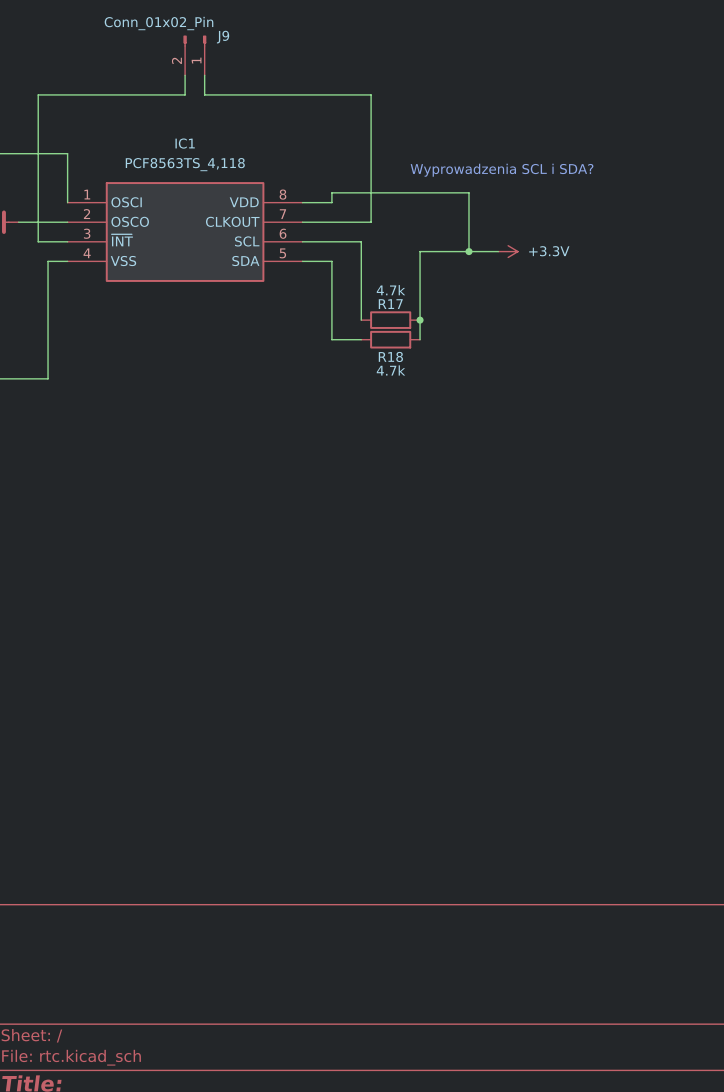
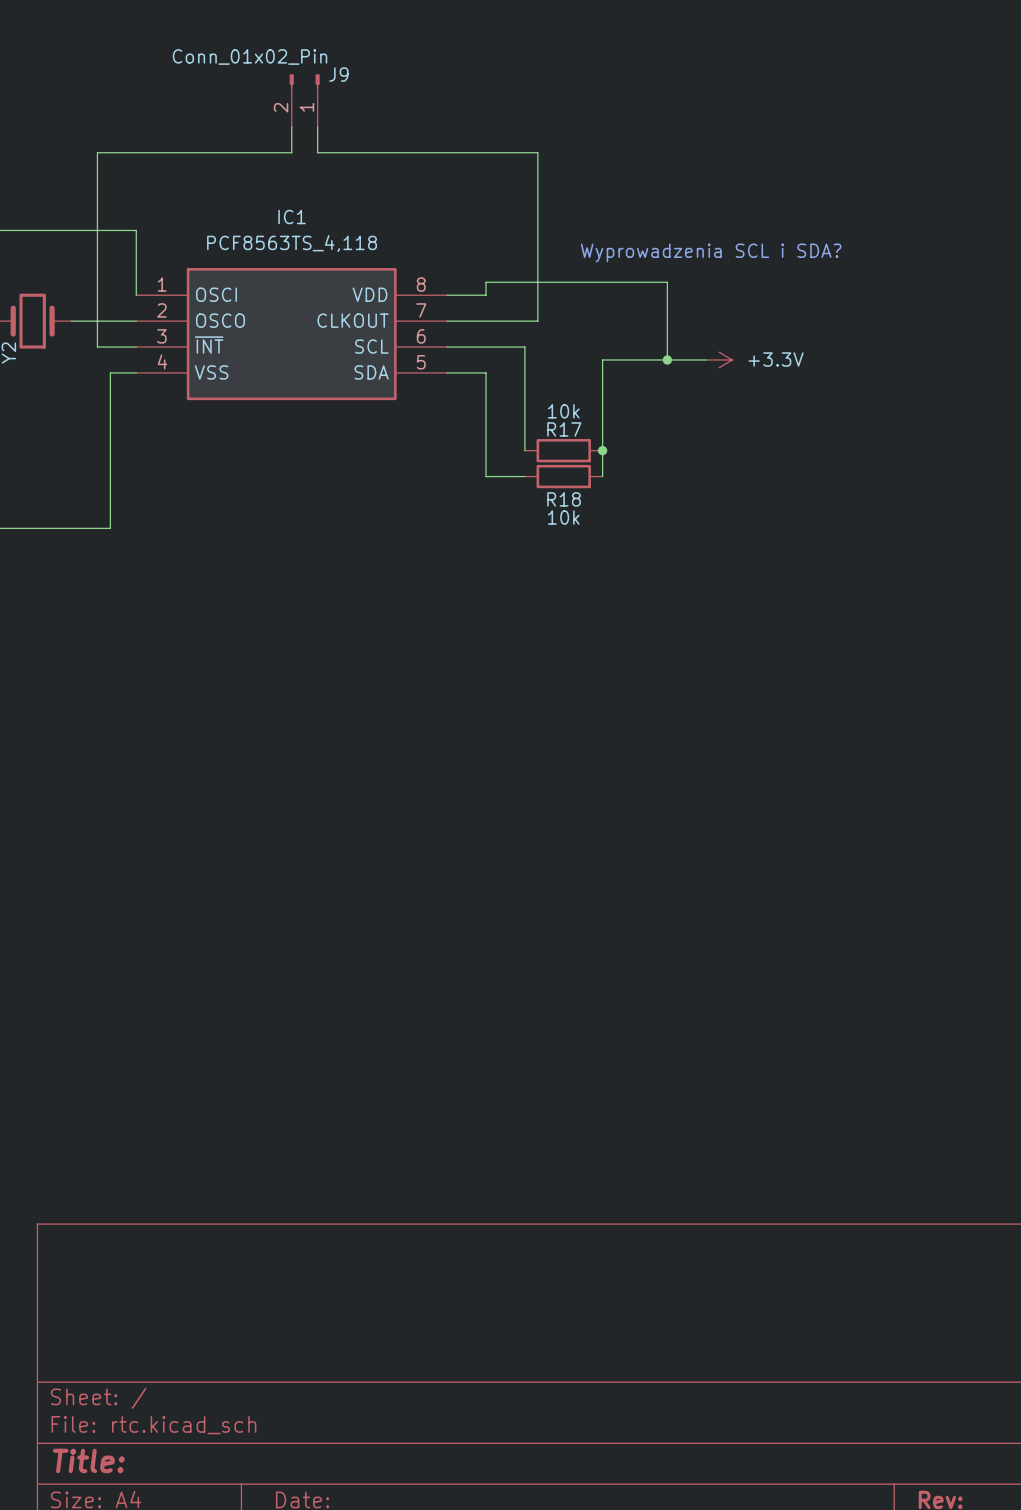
R17 value: 4.7k (390, 290) -> 10k (563, 411)
R18 value: 4.7k (390, 370) -> 10k (563, 517)

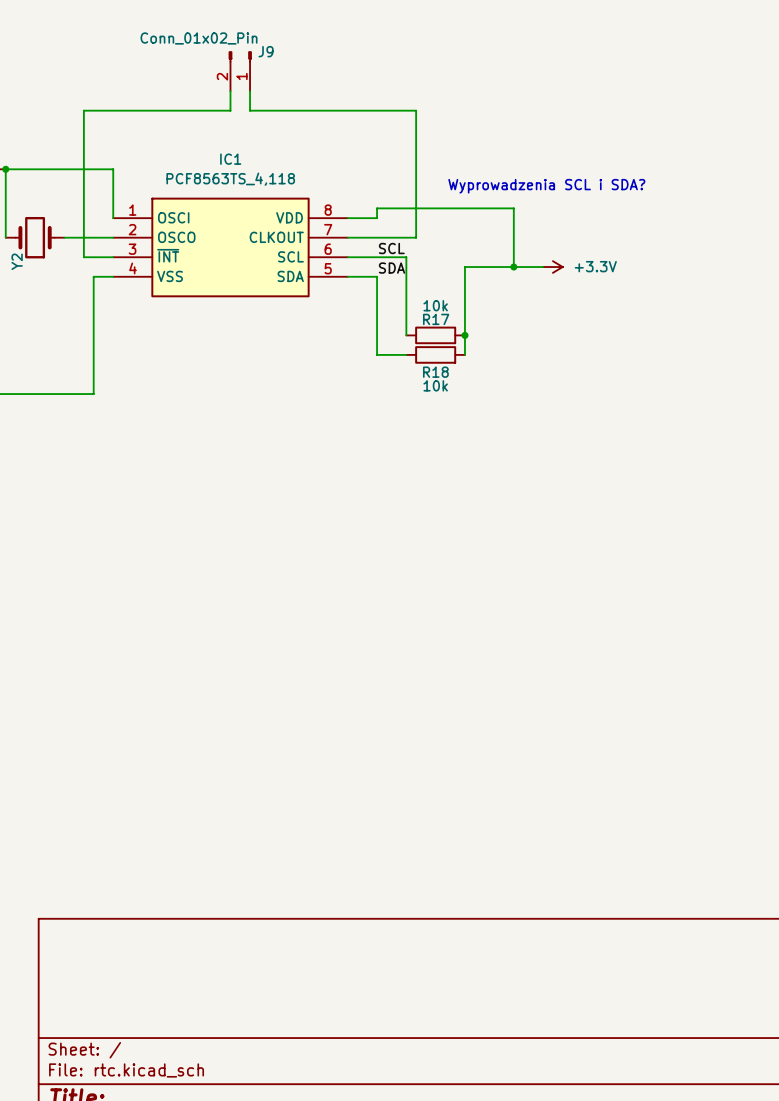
label: none -> SCL (391, 248)
label: none -> SDA (392, 268)

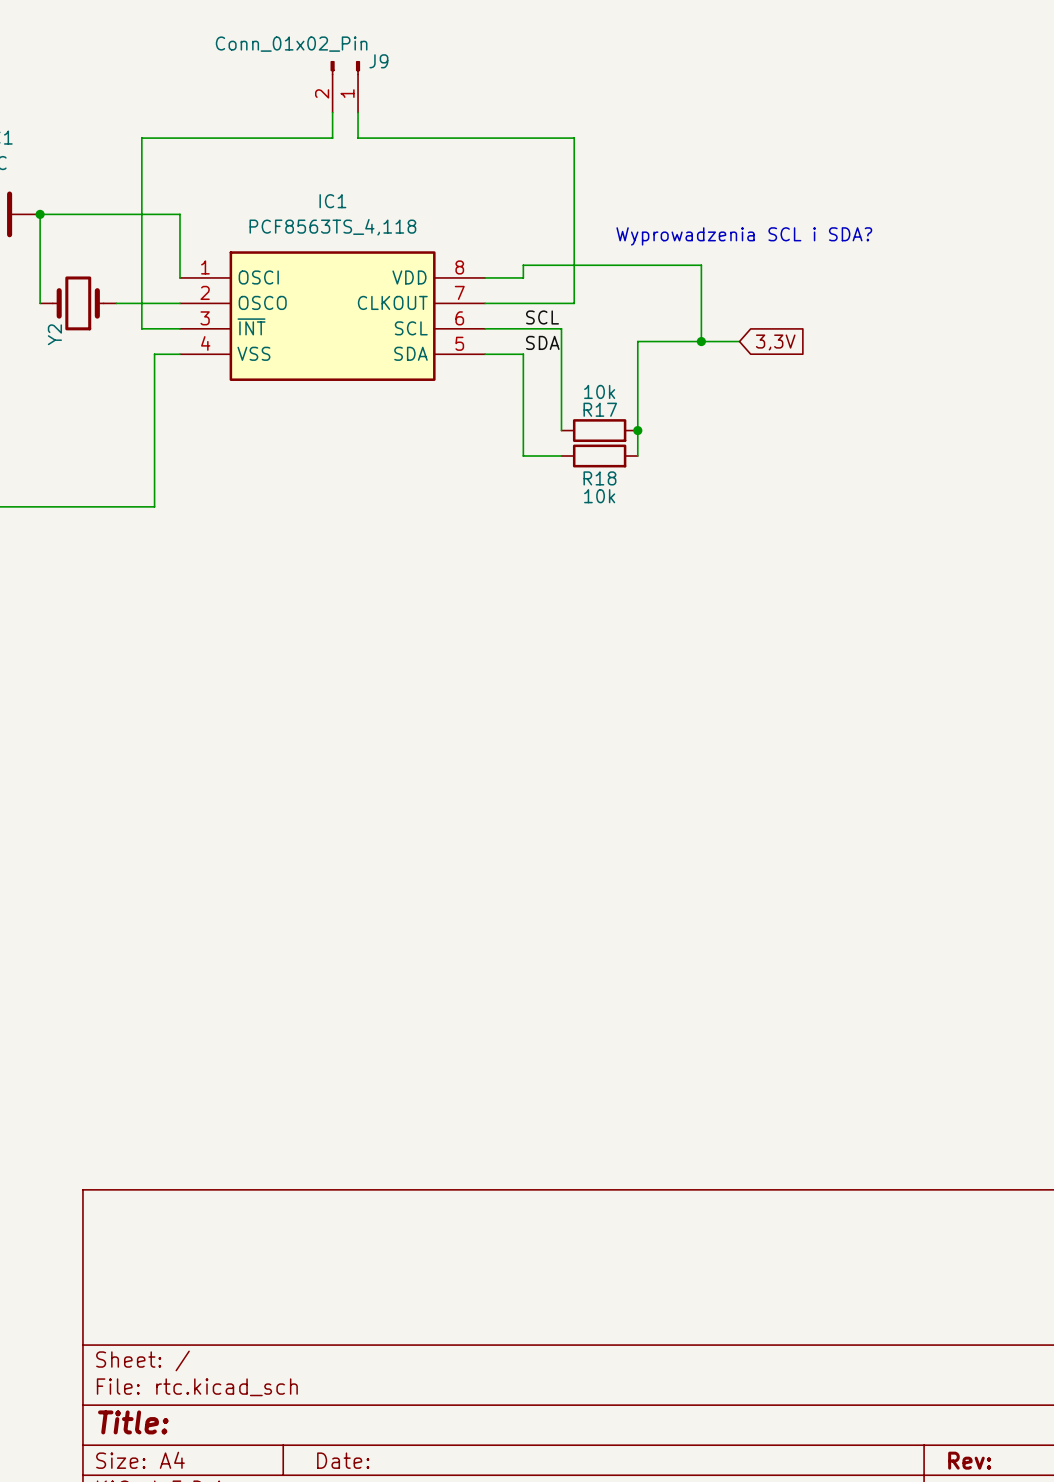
power symbol: +3.3V (552, 267) -> none
global label: none -> 3,3V (775, 342)

